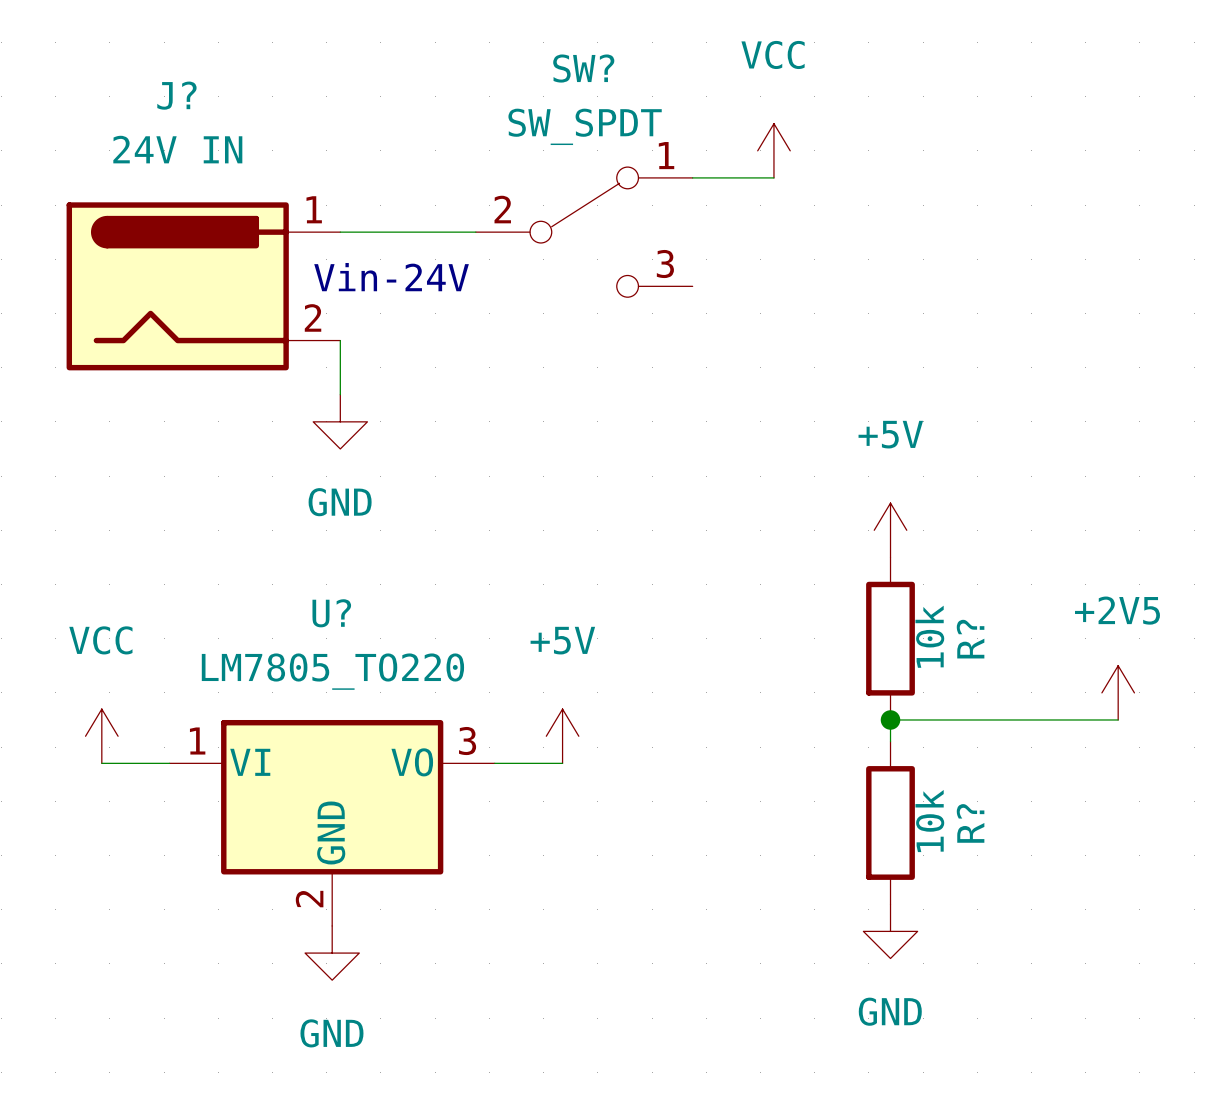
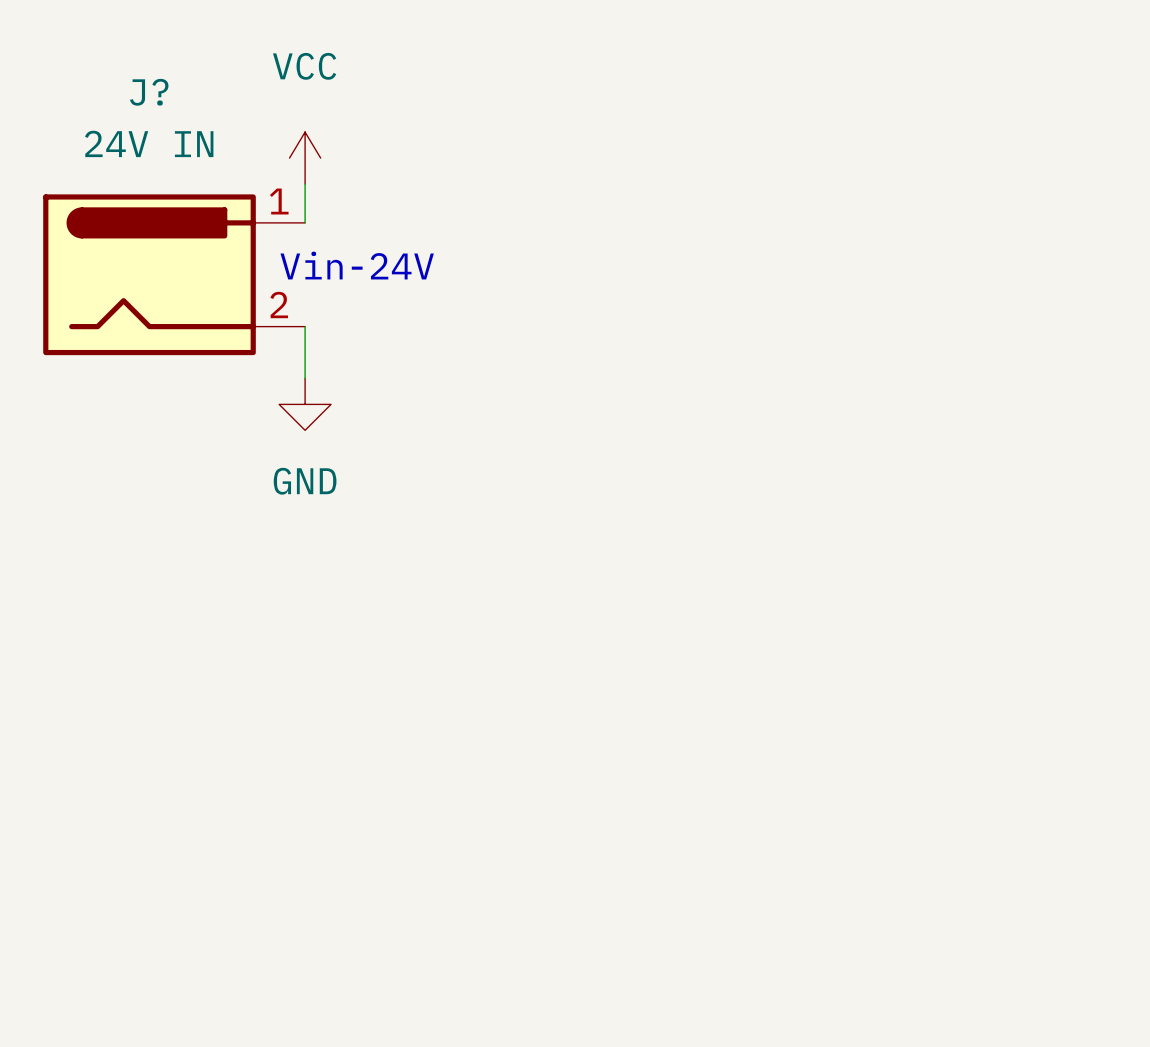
power symbol: VCC (773, 150) -> none
power symbol: none -> VCC (305, 158)
wire: (692, 177) (773, 177) -> none
wire: (340, 232) (475, 232) -> (305, 222) (305, 184)
SW?: SW_SPDT (584, 232) -> none
power symbol: +5V (890, 530) -> none
R?: 10k (890, 638) -> none
power symbol: +2V5 (1118, 692) -> none
junction: (890, 719) -> none
wire: (1118, 719) (890, 719) (890, 741) -> none
power symbol: VCC (101, 736) -> none
power symbol: +5V (562, 736) -> none
wire: (101, 763) (169, 763) -> none
wire: (494, 763) (562, 763) -> none
U?: LM7805_TO220 (332, 822) -> none
R?: 10k (890, 822) -> none
power symbol: GND (890, 931) -> none
power symbol: GND (332, 953) -> none

